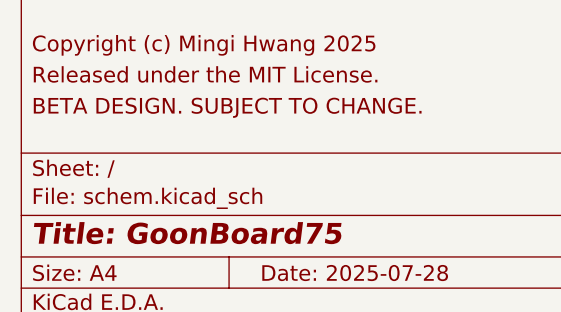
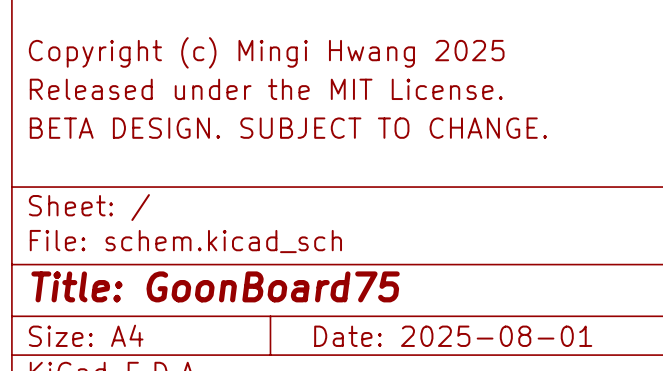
title block: Date: 2025-07-28 (355, 273) -> Date: 2025-08-01 (453, 336)

